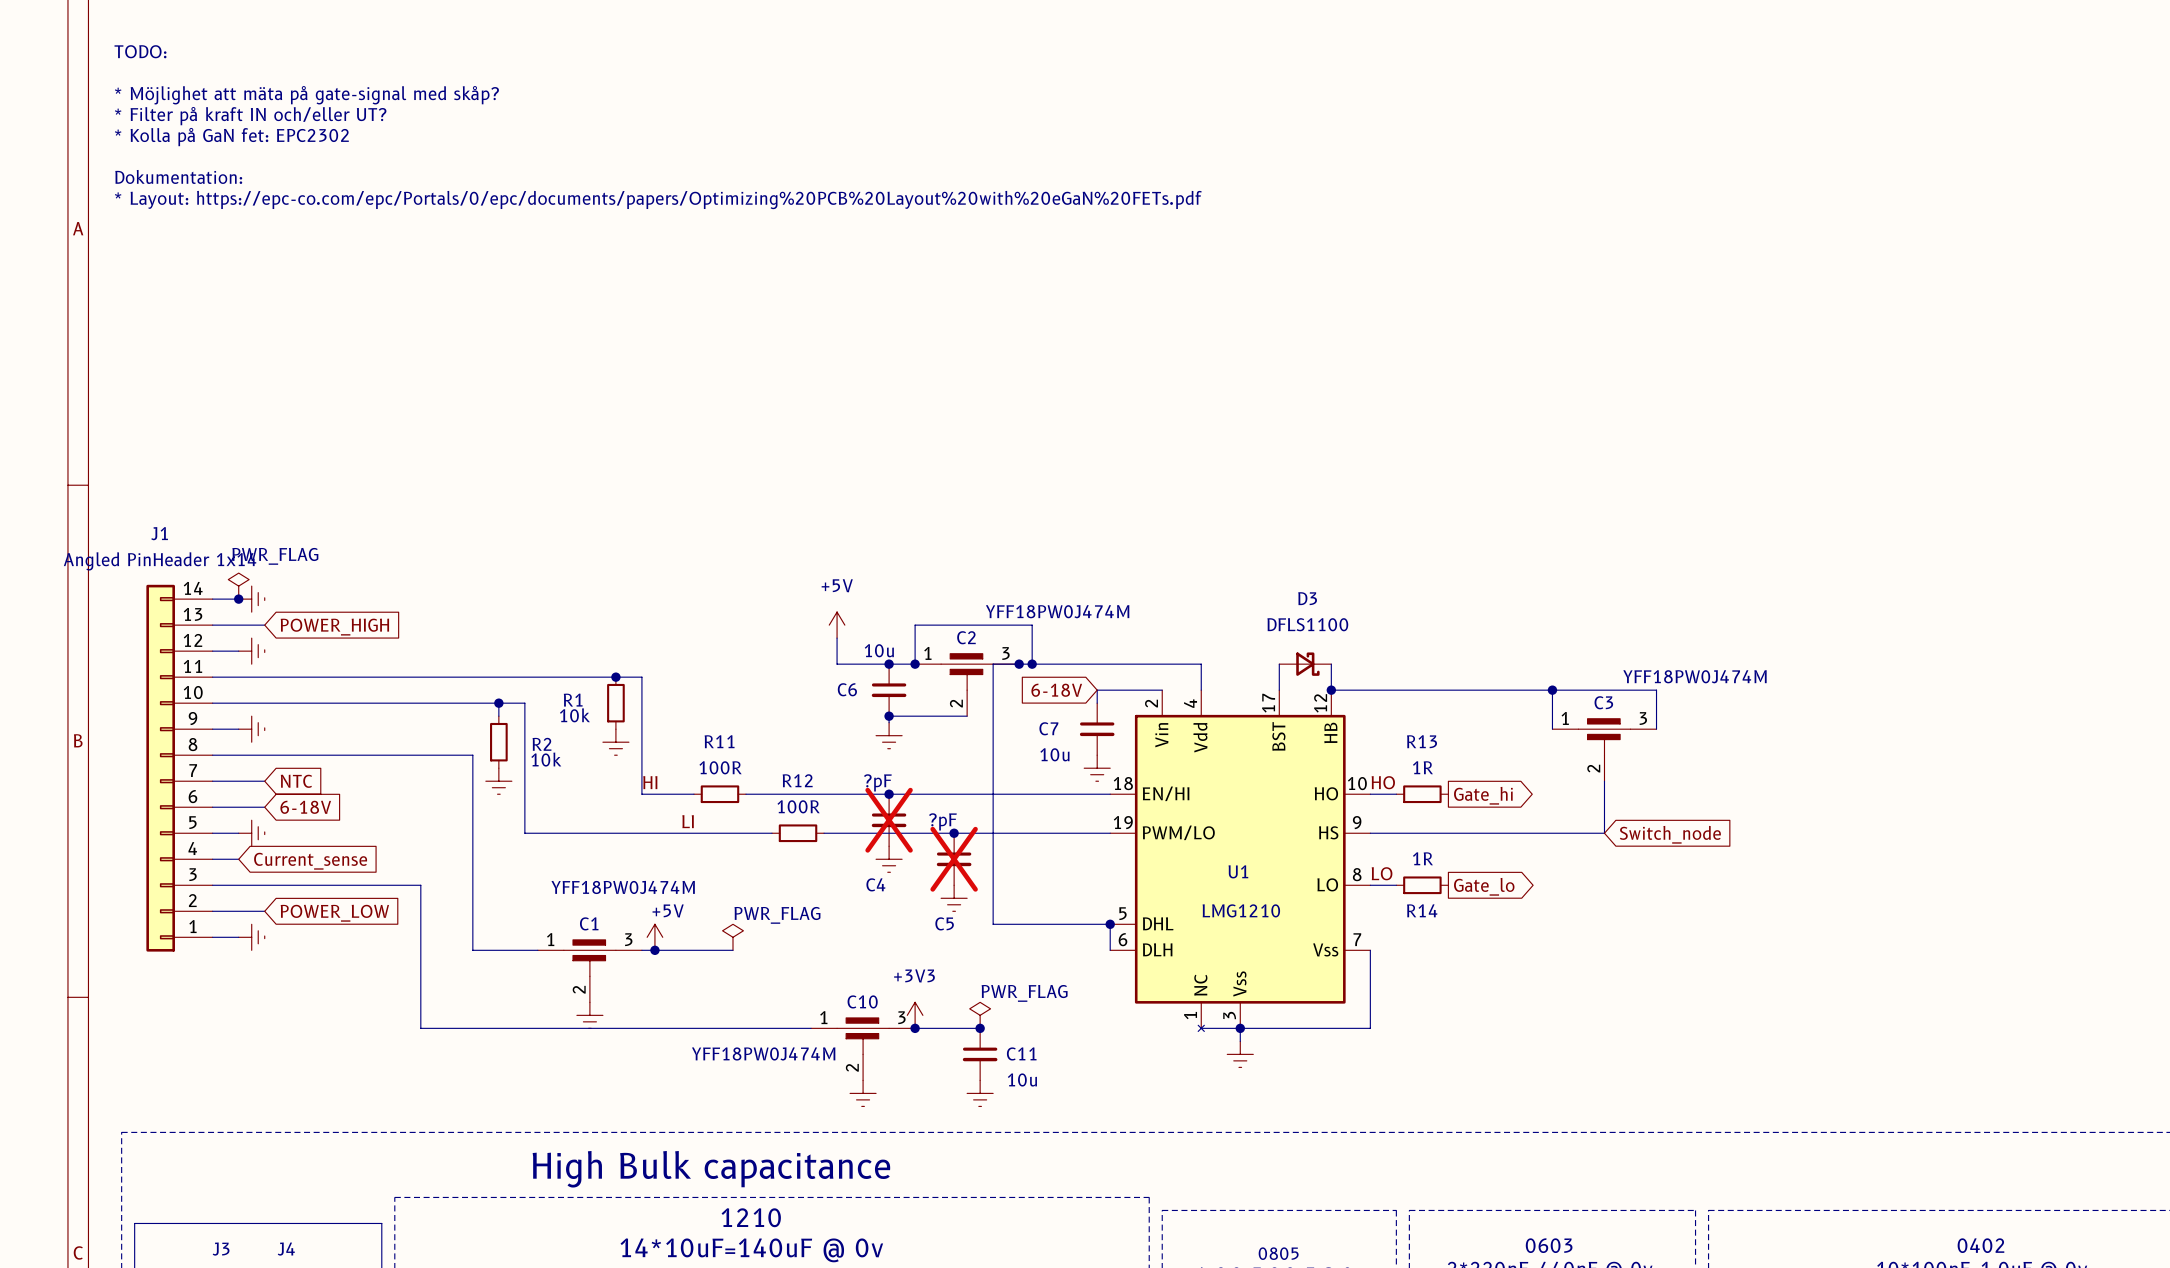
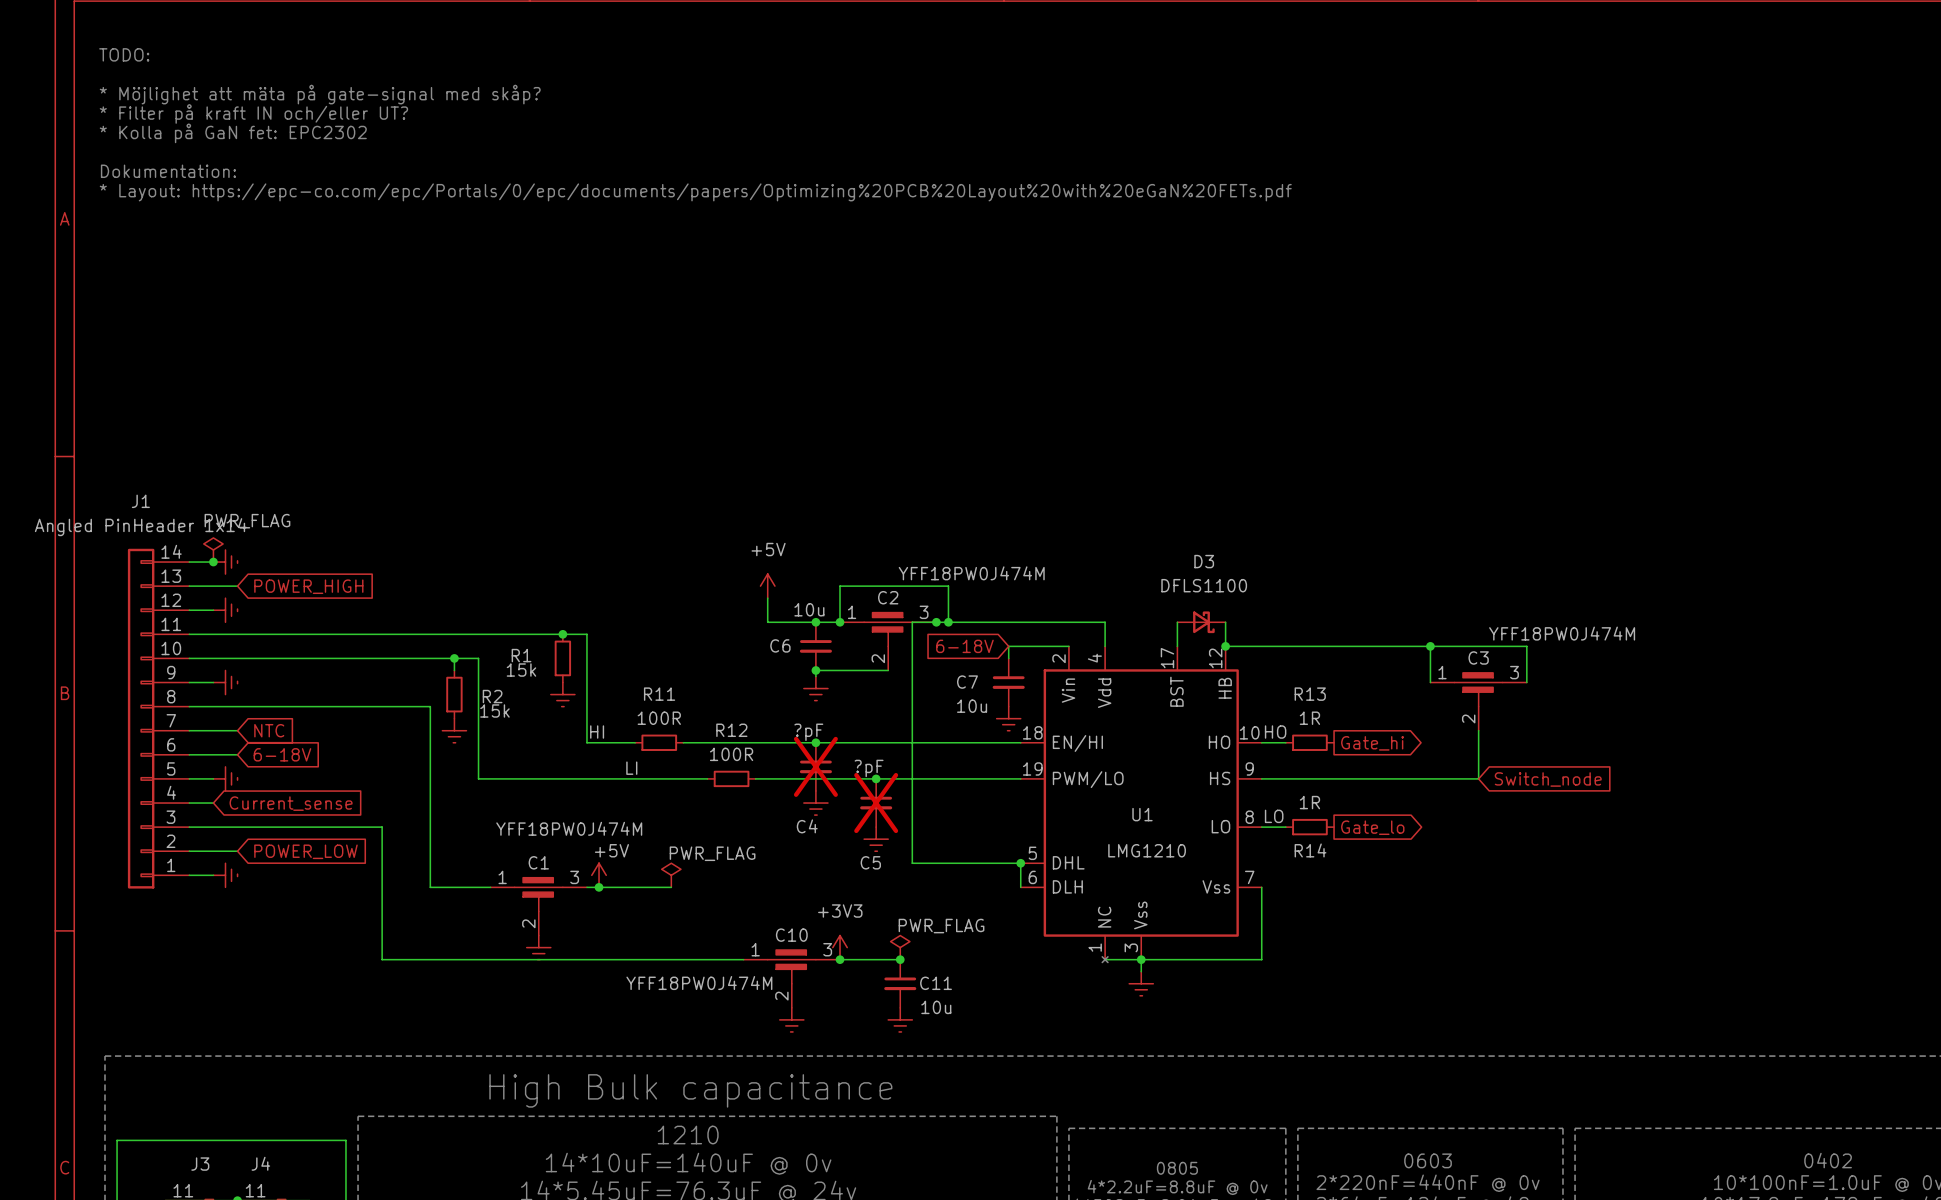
R1 value: 10k (574, 715) -> 15k (521, 670)
R2 value: 10k (546, 759) -> 15k (494, 710)

